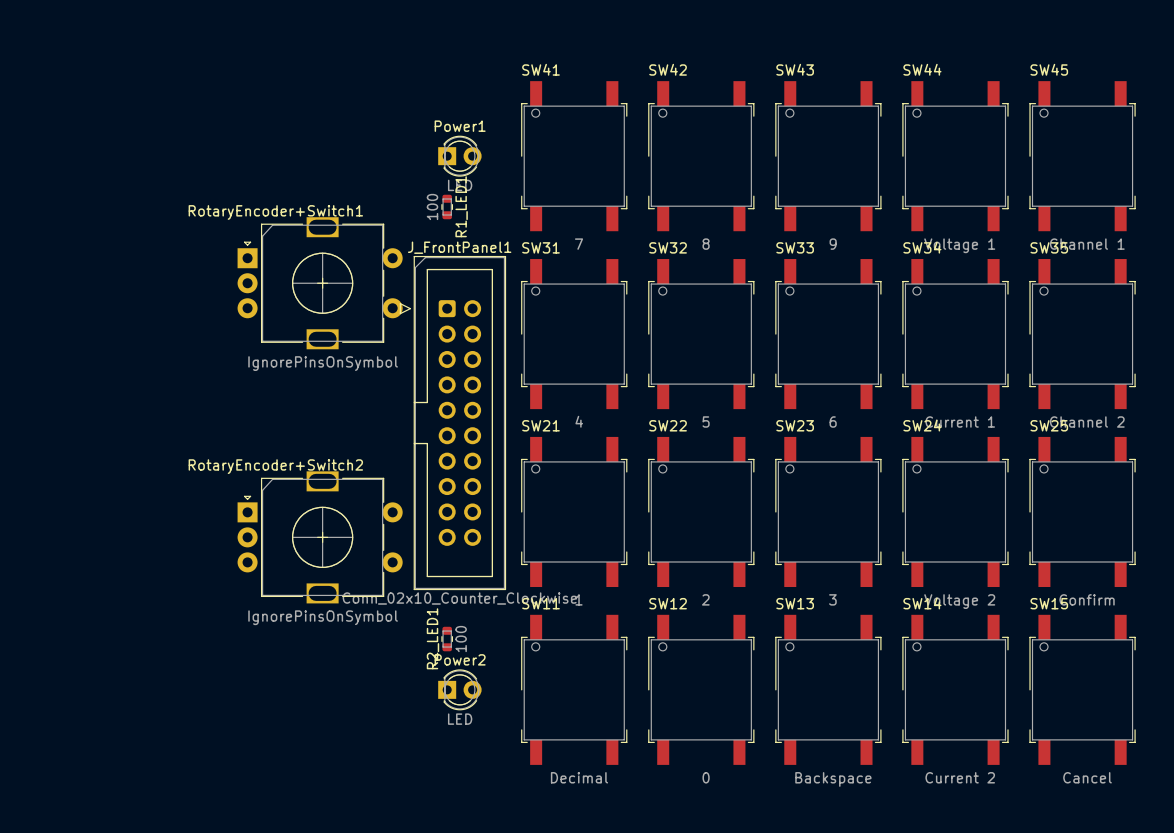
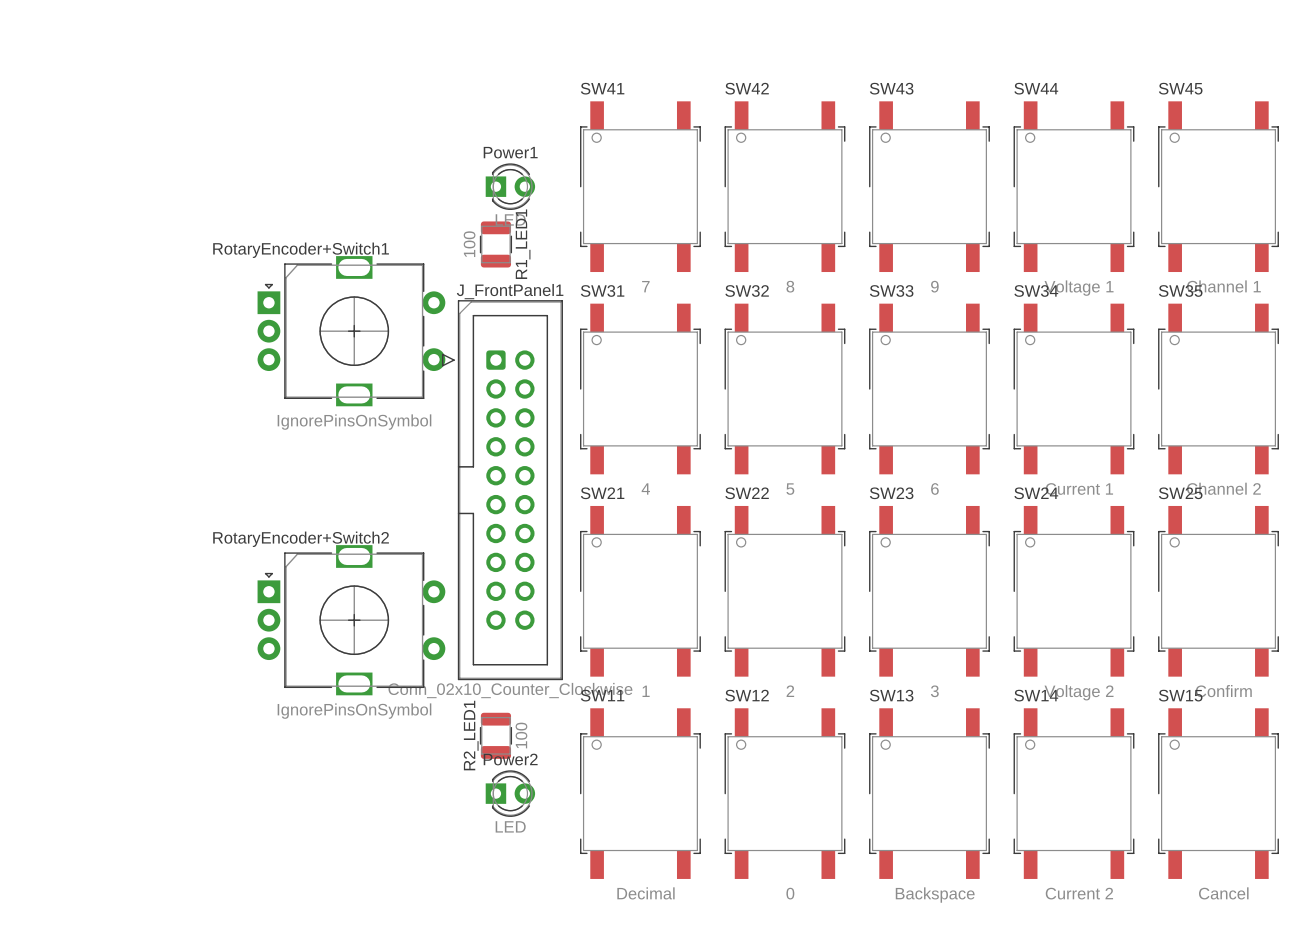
R1_LED1 footprint: [441, 194, 454, 220] -> [479, 221, 513, 268]
R2_LED1 footprint: [441, 626, 454, 652] -> [479, 712, 513, 759]

